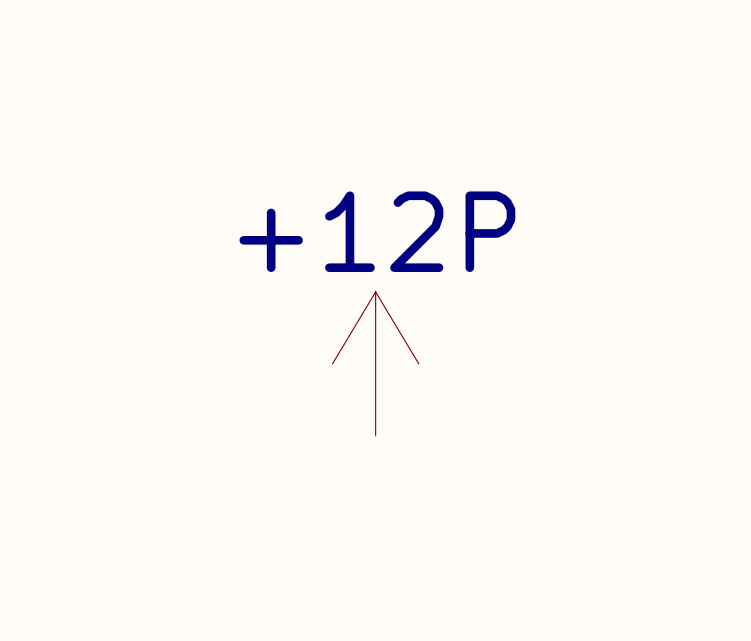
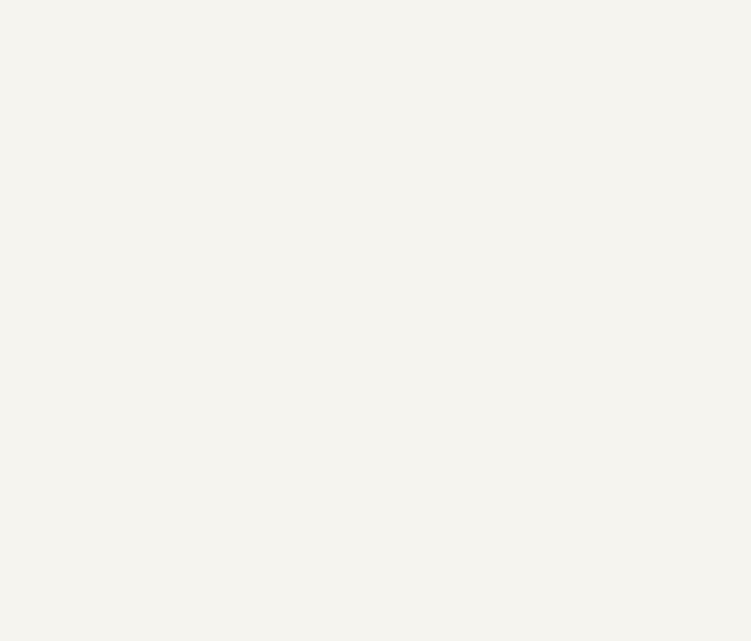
power symbol: +12P (375, 363) -> none

